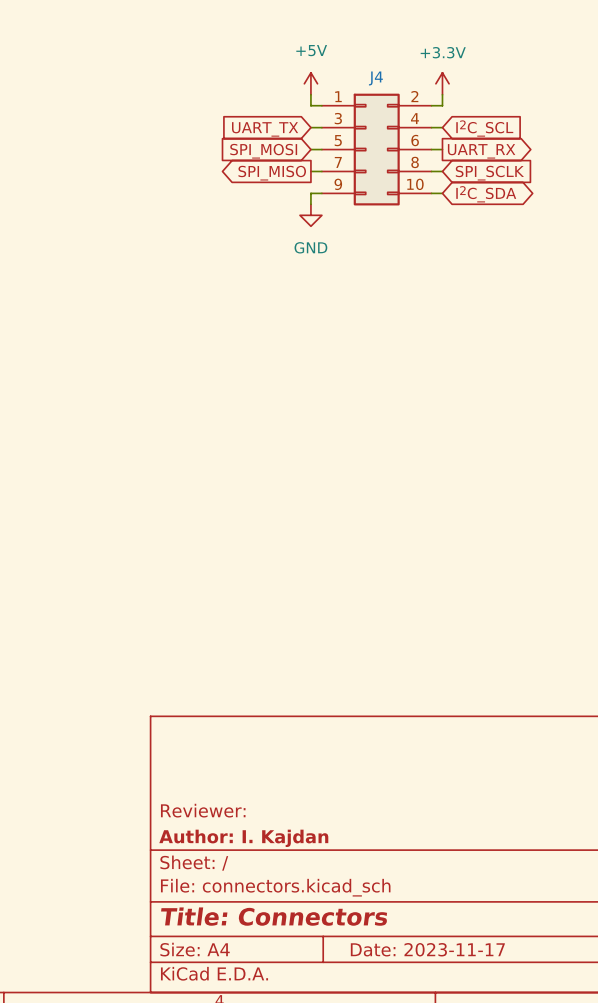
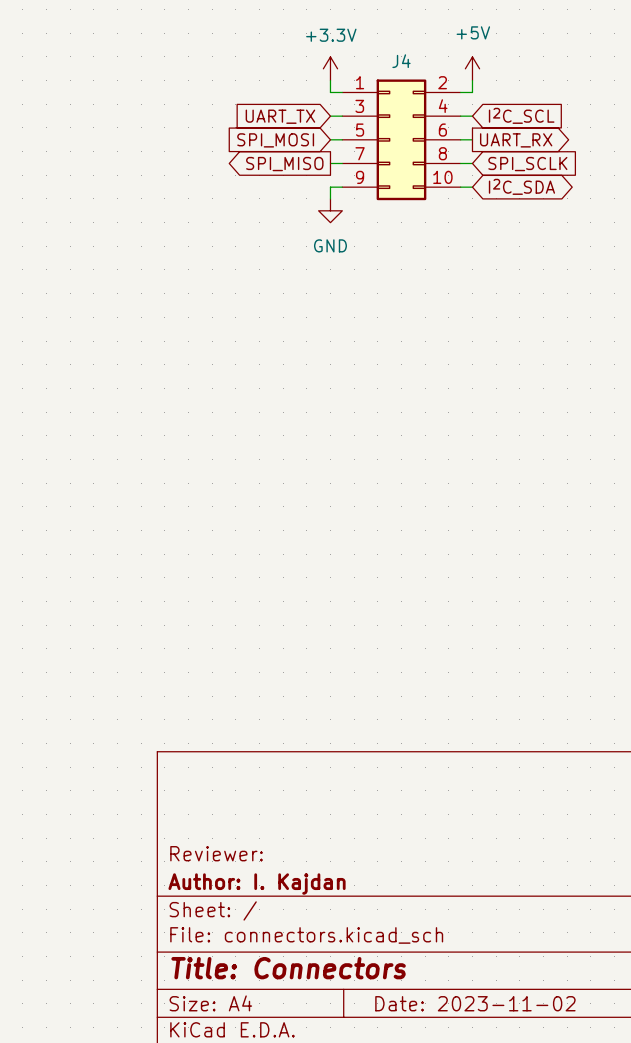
power symbol: +5V (310, 83) -> +3.3V (330, 68)
power symbol: +3.3V (442, 83) -> +5V (472, 68)
title block: Date: 2023-11-17 (427, 949) -> Date: 2023-11-02 (475, 1003)

